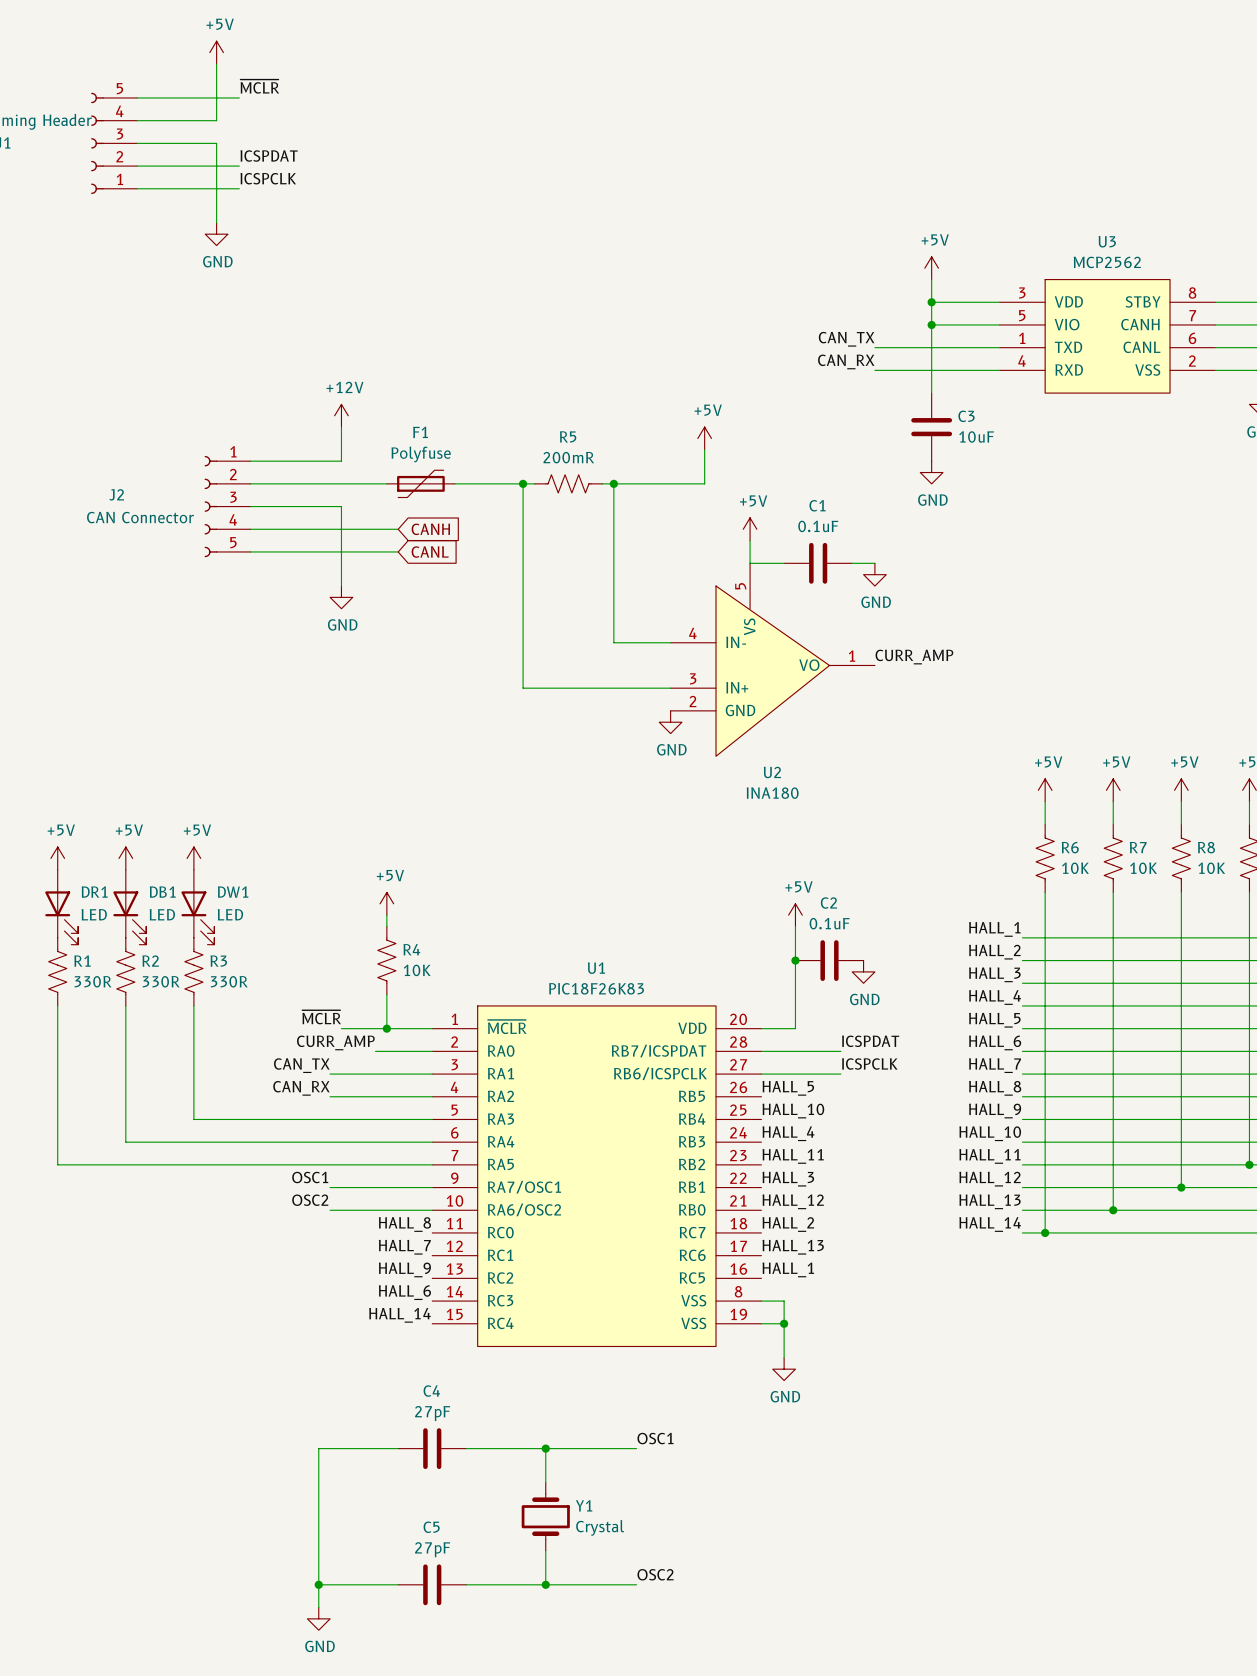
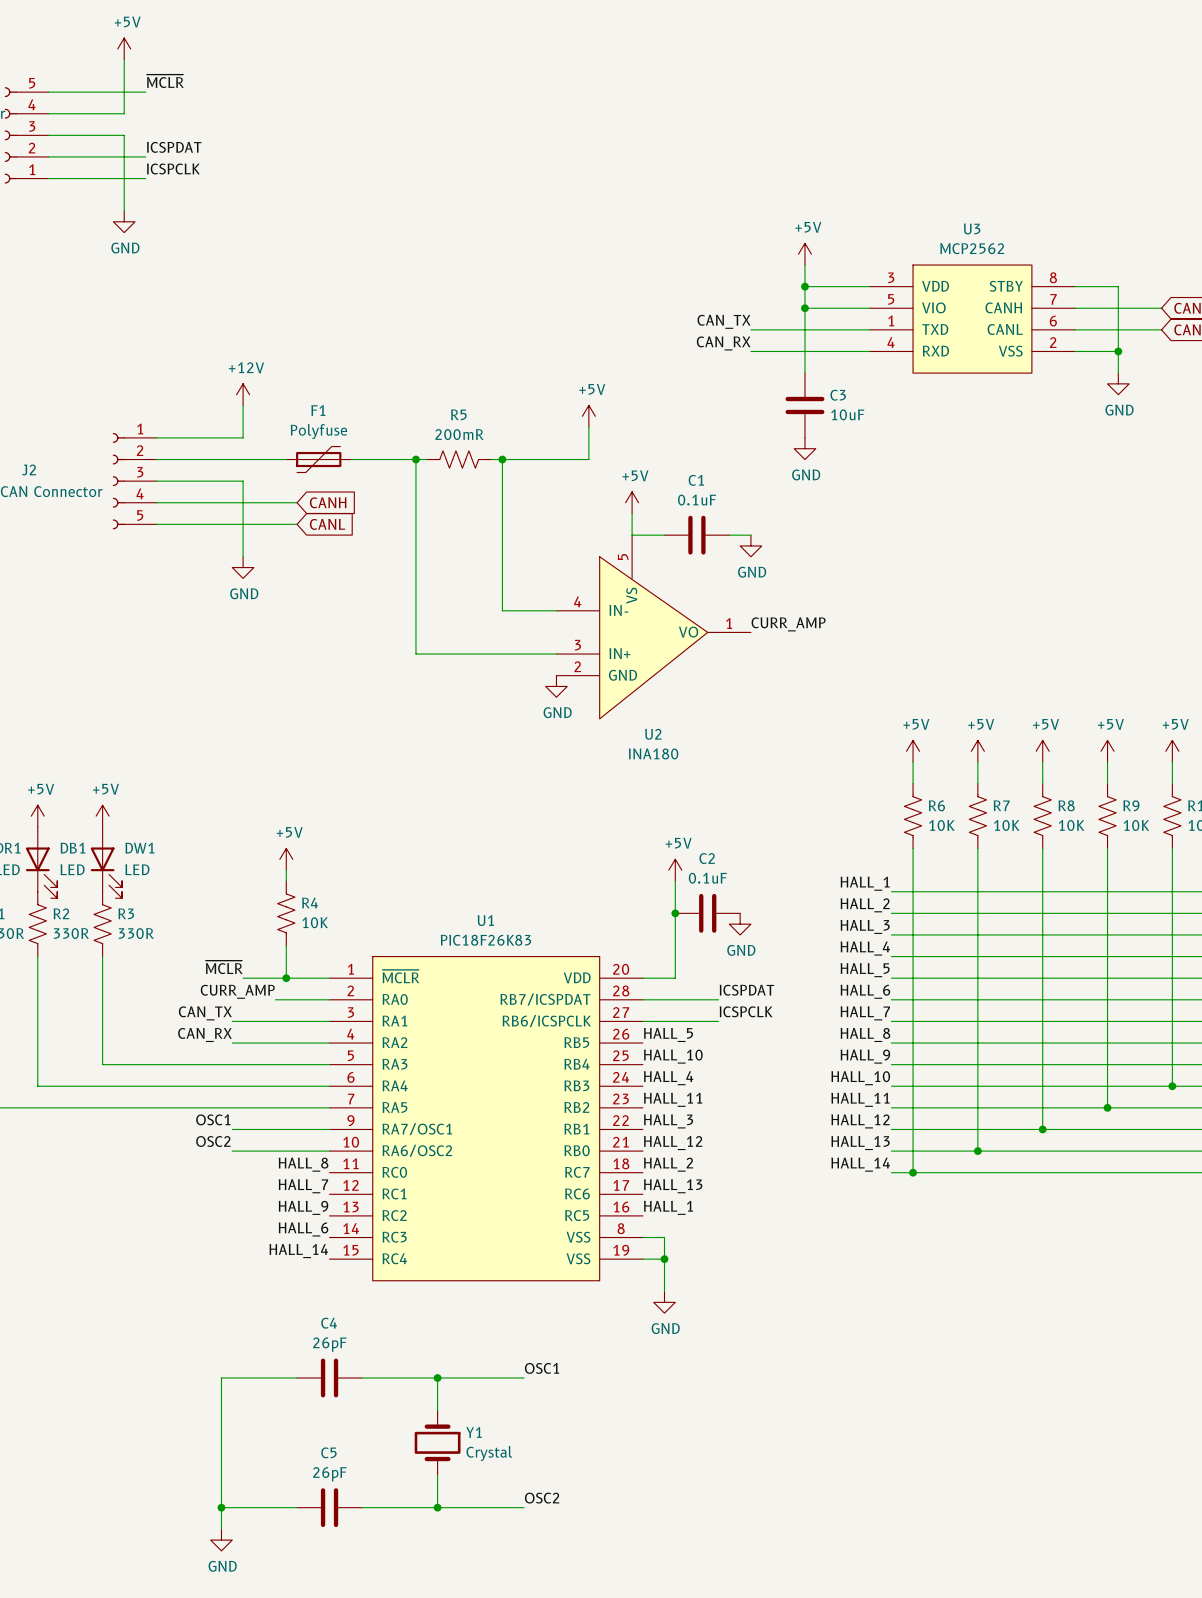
C4 value: 27pF (432, 1413) -> 26pF (329, 1344)
C5 value: 27pF (432, 1549) -> 26pF (329, 1474)

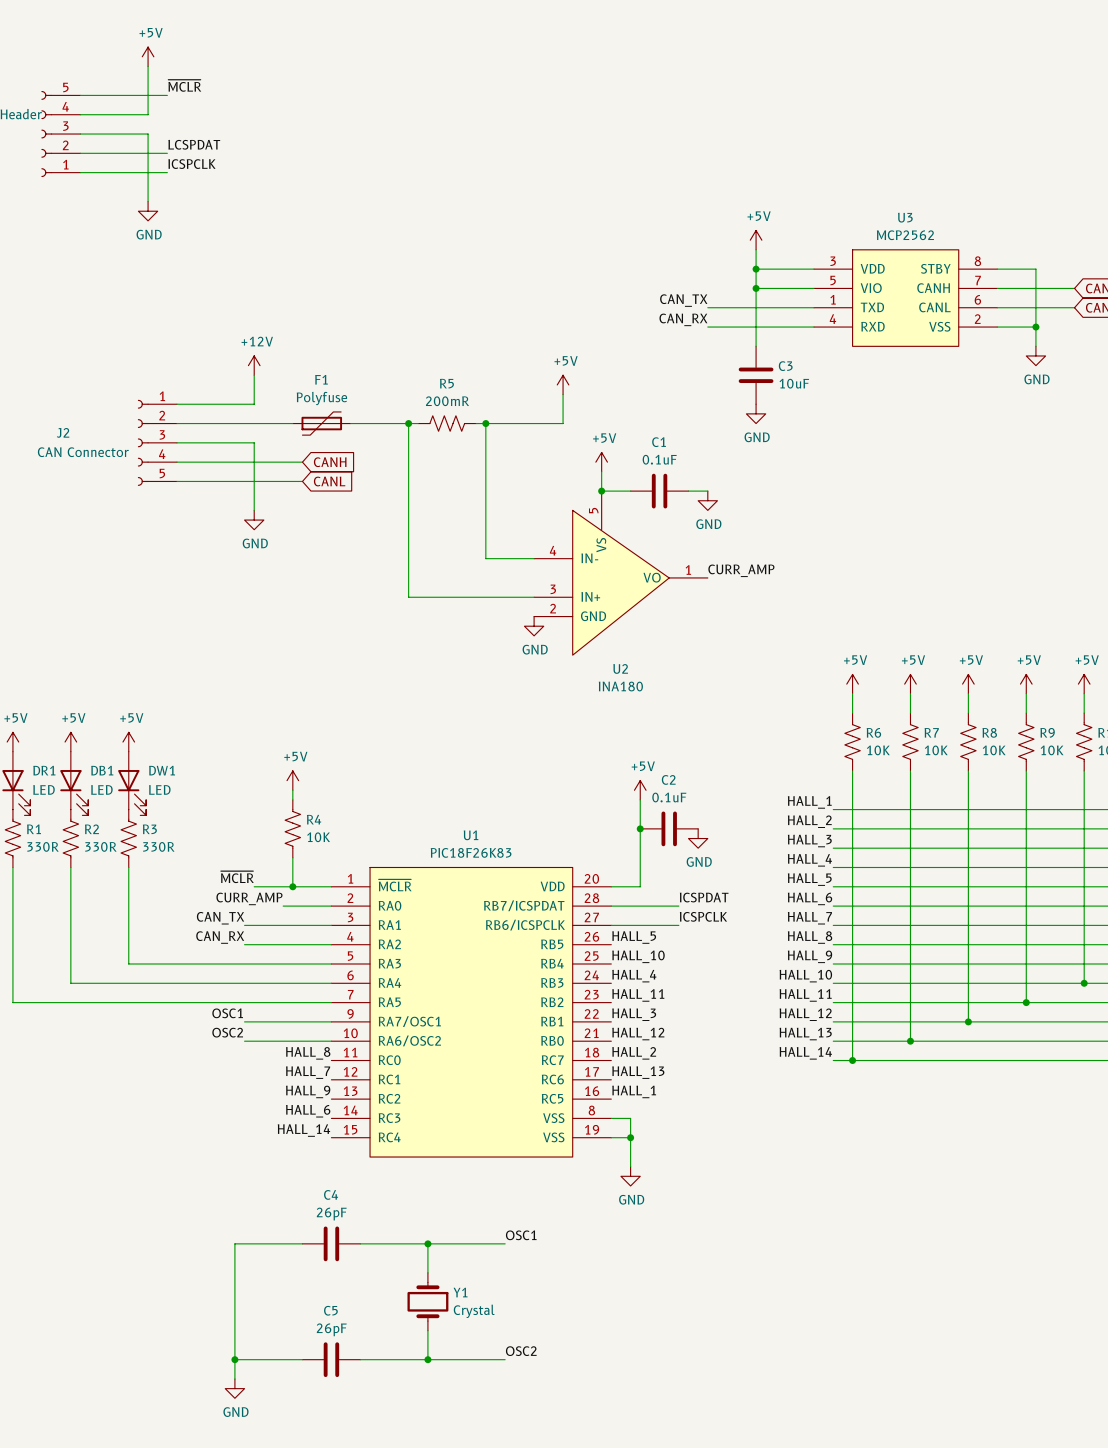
label: ICSPDAT (174, 147) -> LCSPDAT (194, 144)
junction: none -> (601, 491)

